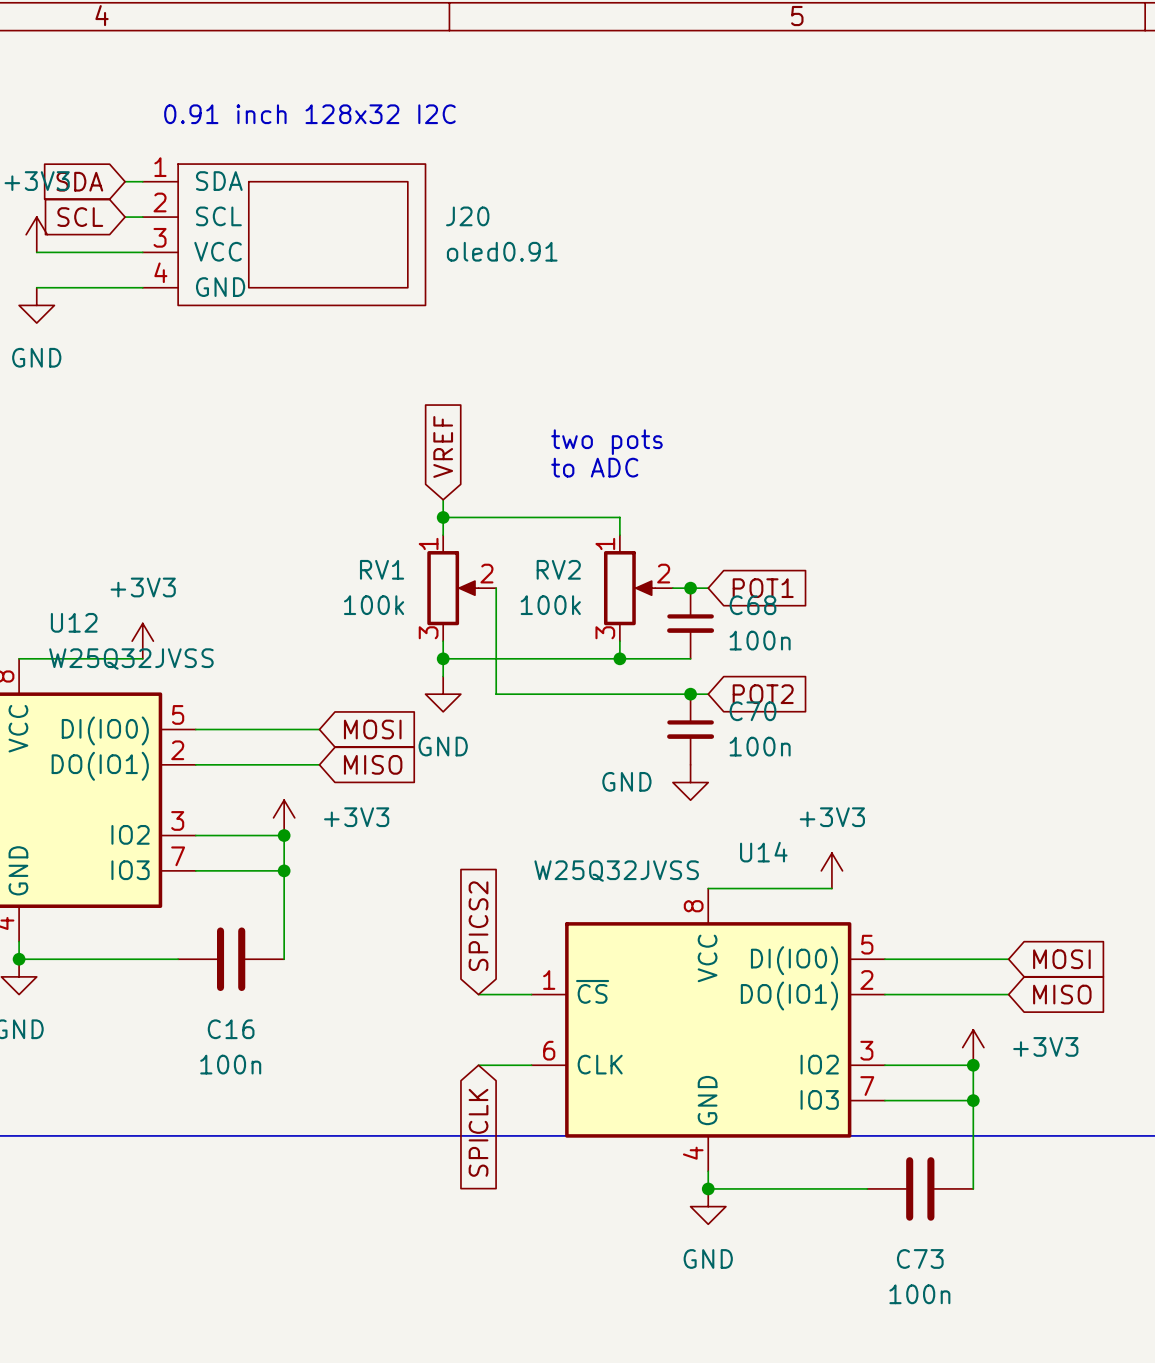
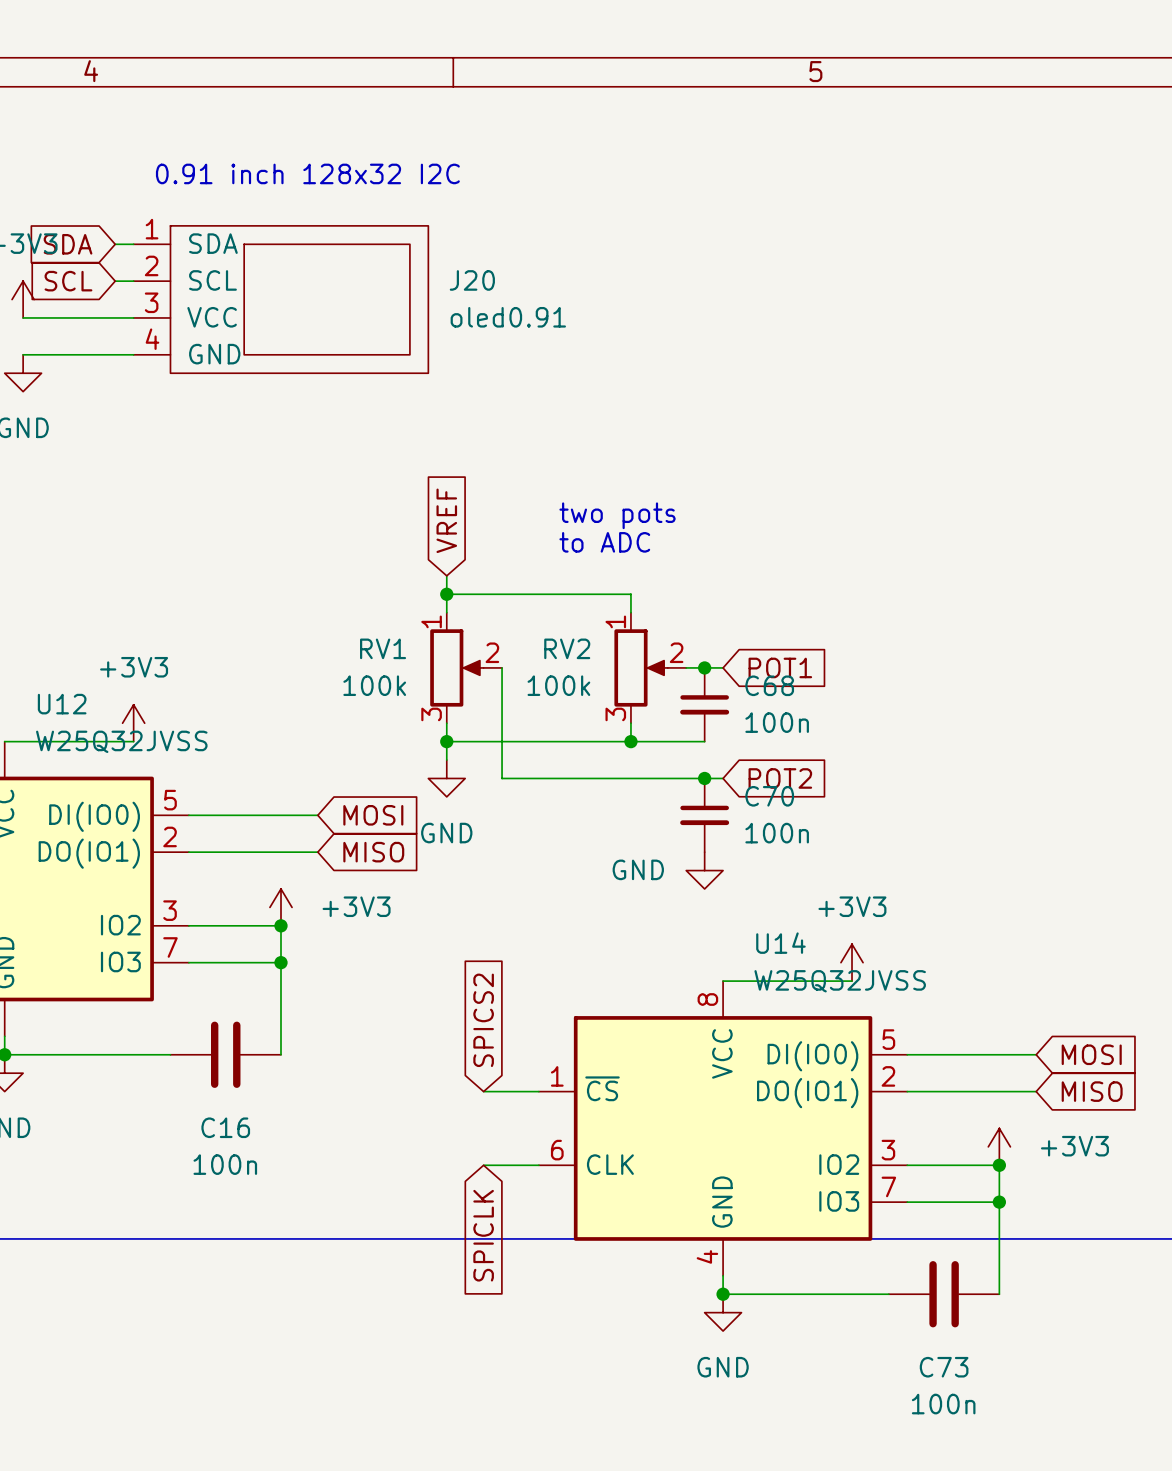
U14 value position: W25Q32JVSS (616, 871) -> W25Q32JVSS (840, 981)

